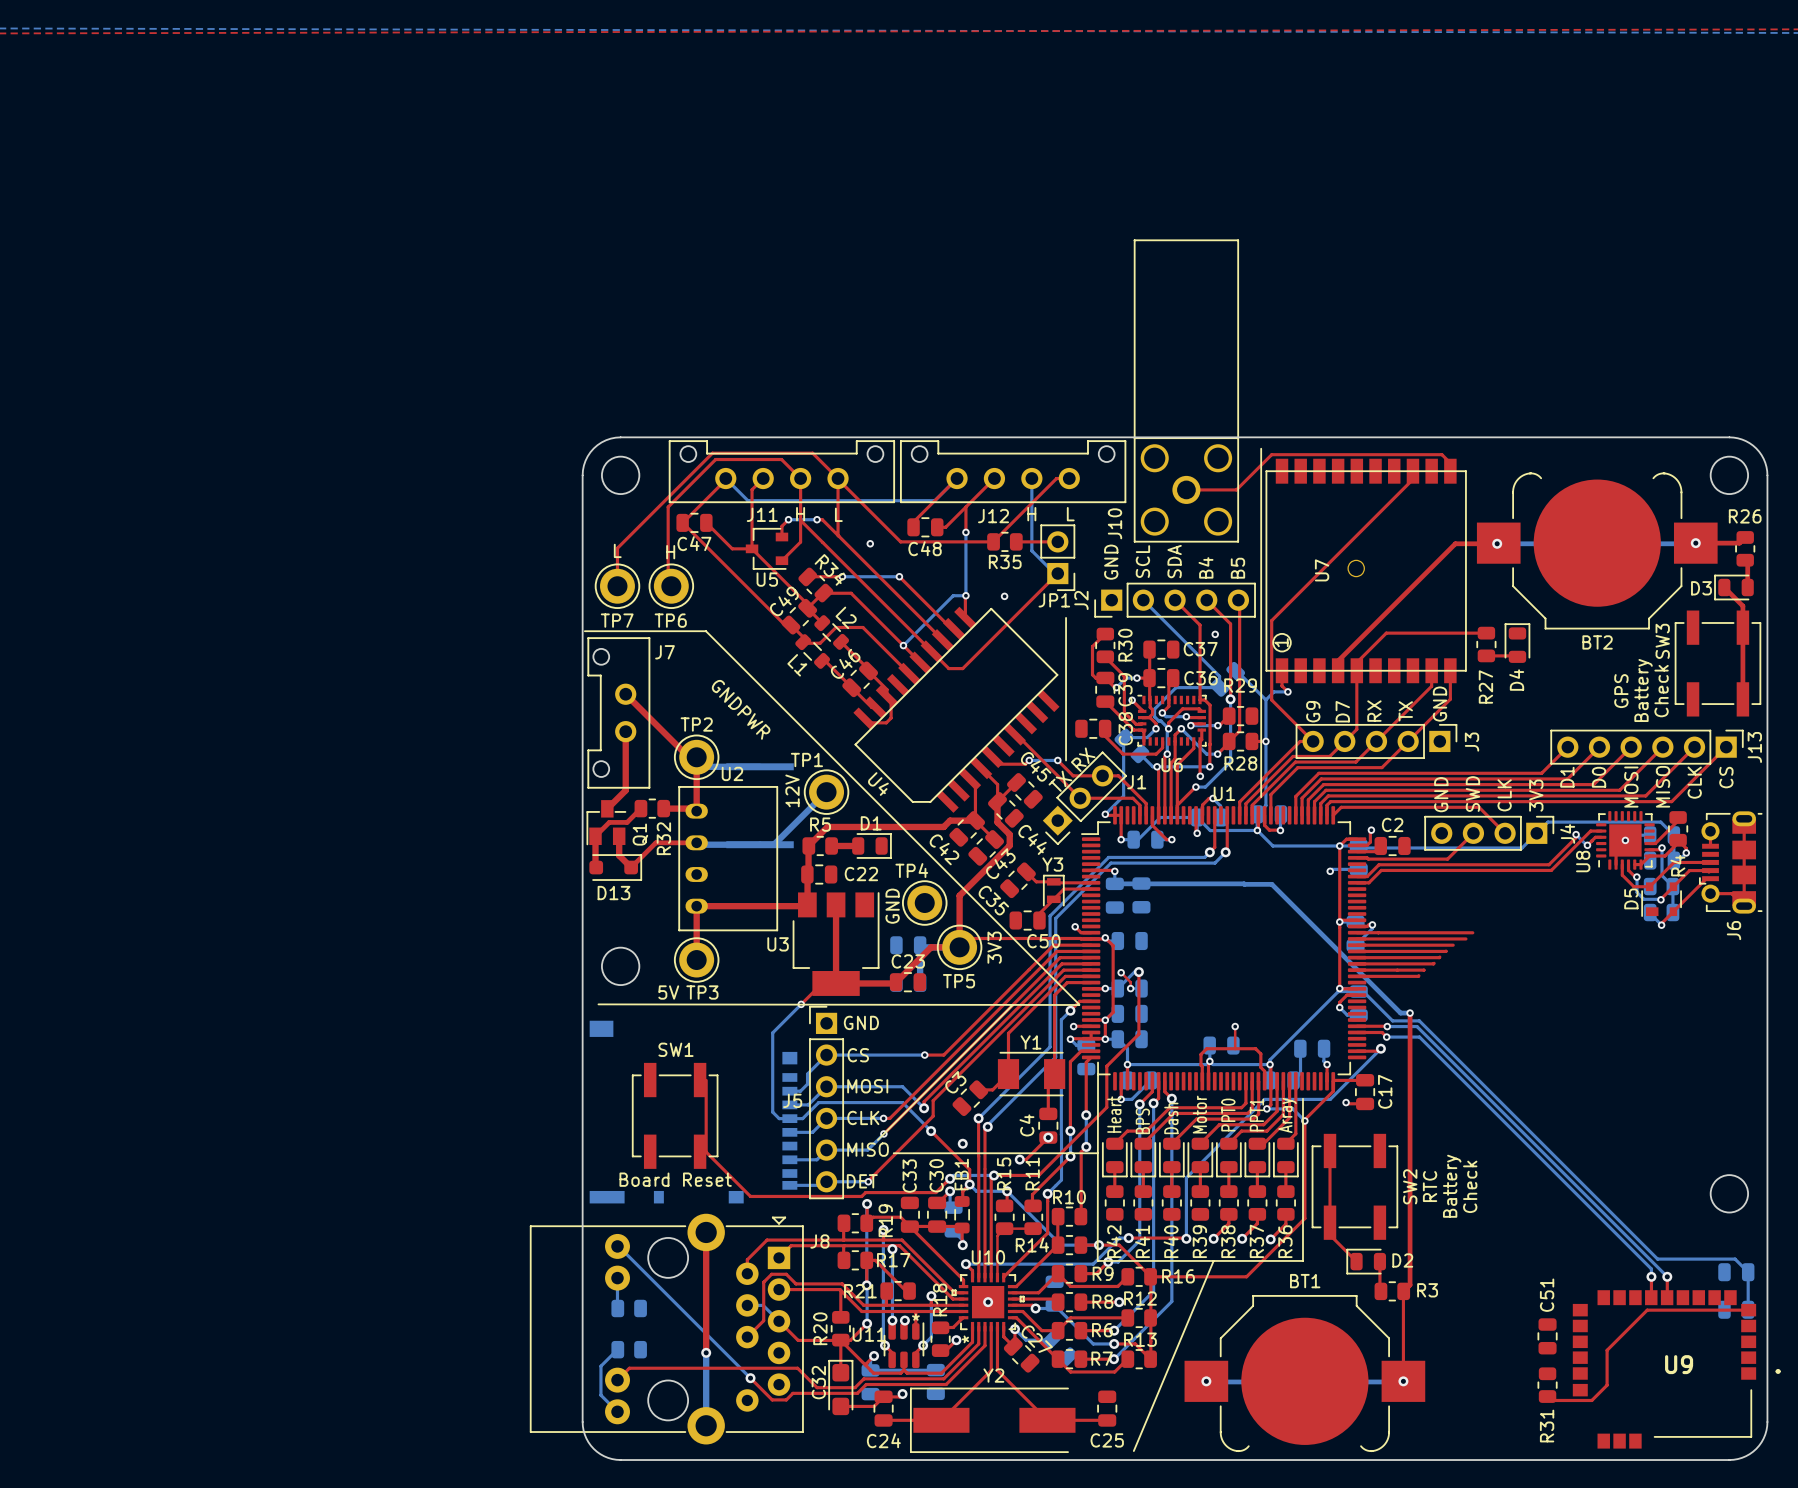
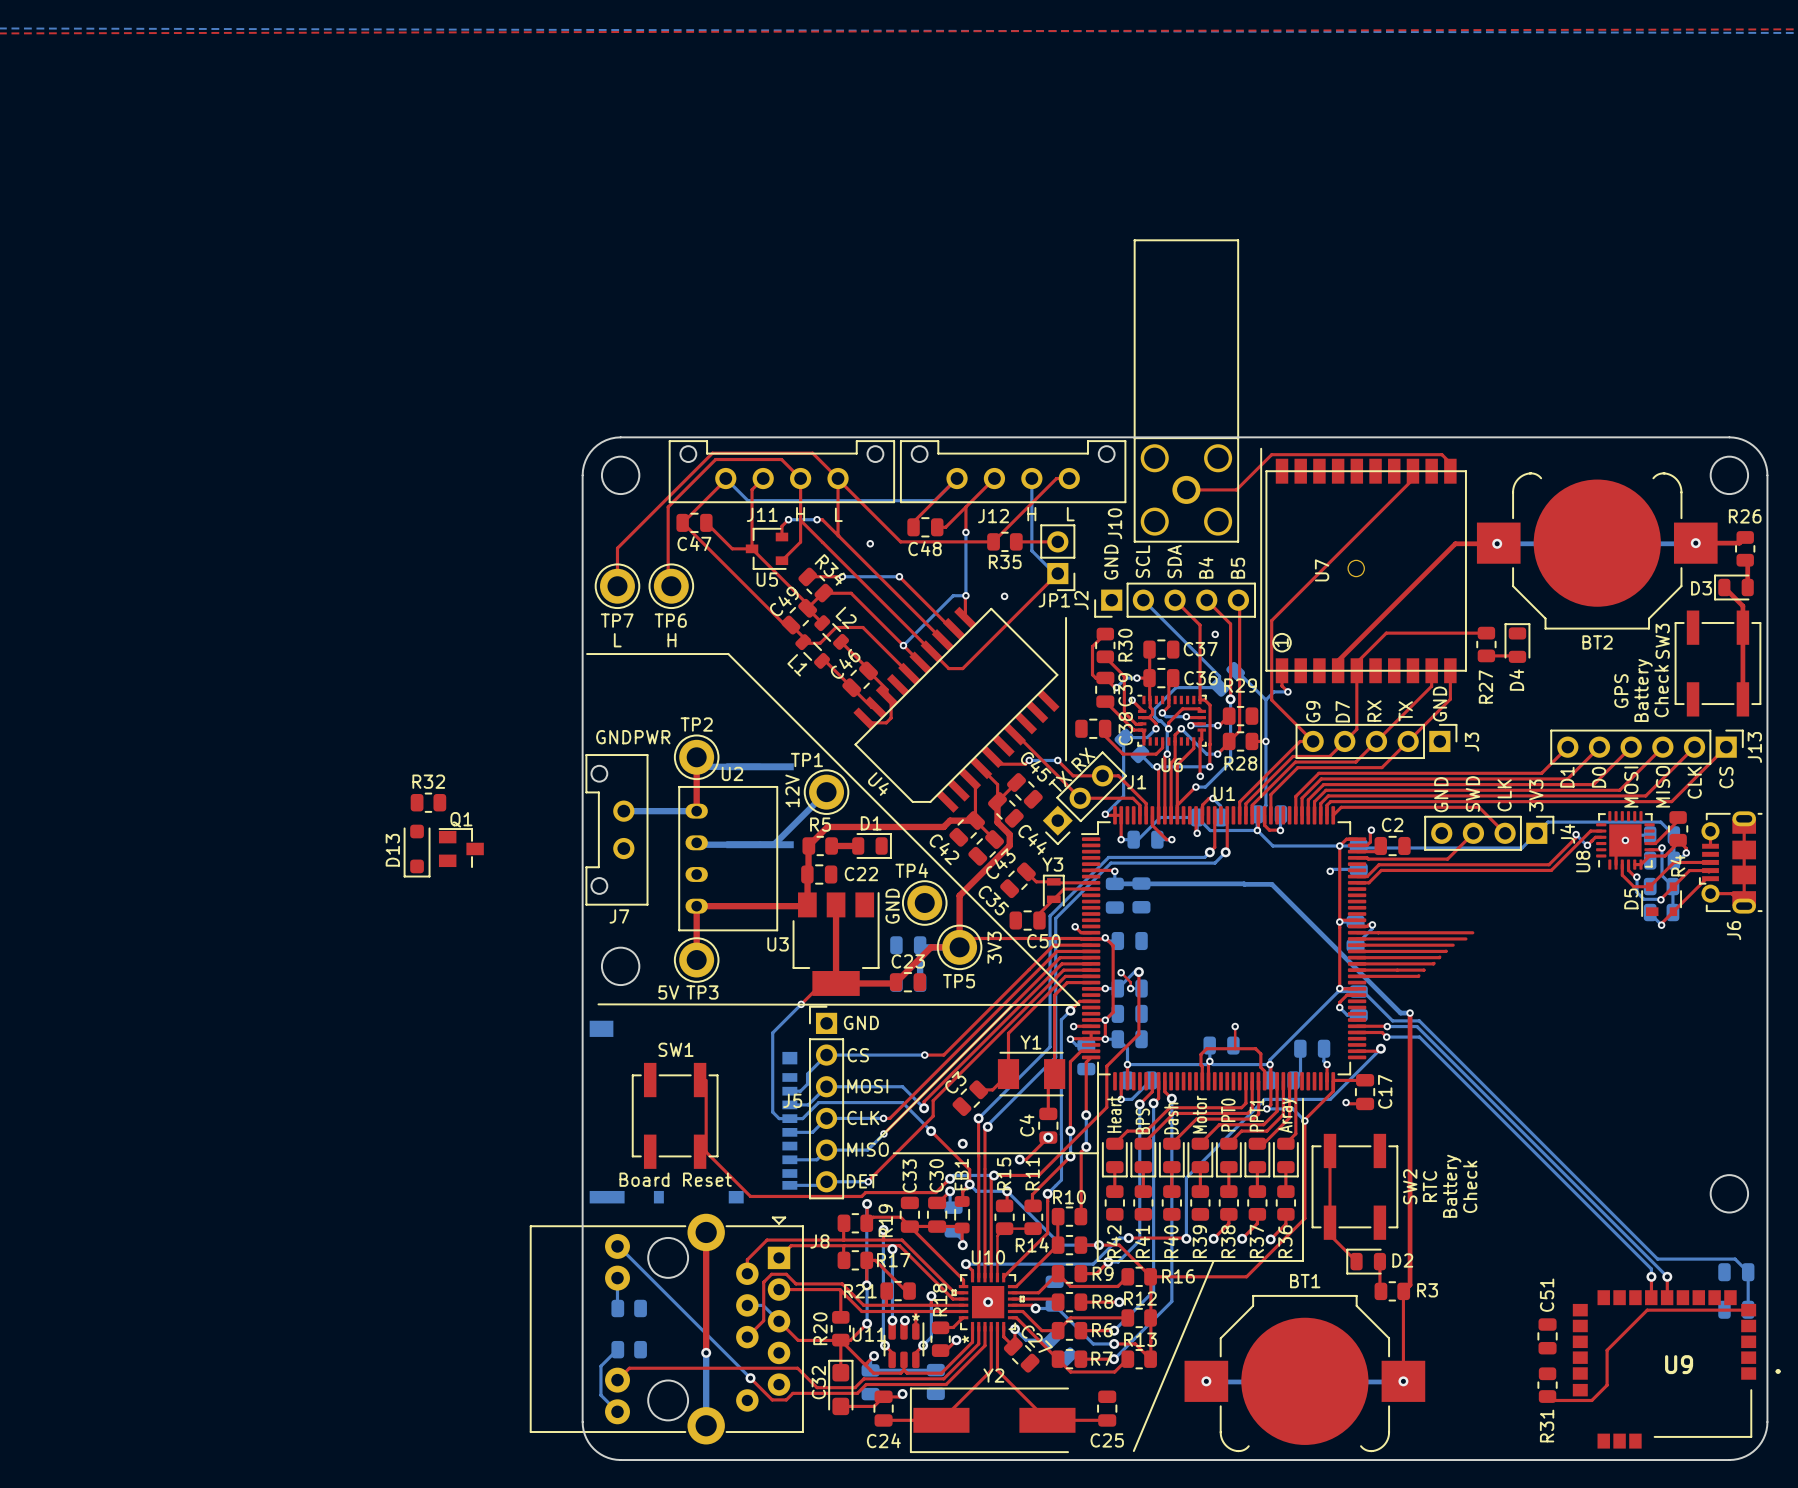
text position: L (617, 550) -> L (617, 640)
text position: H (670, 552) -> H (671, 640)
line: (584, 631) (706, 631) -> none
line: (706, 631) (1079, 1004) -> (728, 653) (1079, 1005)
J7 name position: J7 (665, 652) -> J7 (619, 916)
line: none -> (587, 654) (728, 654)
top track: (625, 694) (688, 757) (696, 757) -> none
text rotation: 0° (741, 709) -> 45° counterclockwise (633, 737)
text position: GNDPWR (741, 709) -> GNDPWR (633, 737)
J7 position: (618, 712) -> (616, 829)
top track: (625, 731) (625, 790) (607, 808) -> none
top track: (640, 808) (627, 822) (609, 822) (595, 836) (596, 867) -> none
R32 position: (652, 808) -> (428, 802)
top track: (663, 808) (694, 808) (696, 811) -> none
bottom track: none -> (623, 811) (696, 811)
Q1 rotation: 0° (606, 822) -> 90° clockwise (461, 848)
Q1 position: (606, 822) -> (461, 848)
Q1 name position: Q1 (640, 834) -> Q1 (461, 819)
top track: (619, 836) (619, 855) (631, 867) (655, 842) (696, 842) -> none
R32 name rotation: 0° (663, 838) -> 90° clockwise (428, 781)
R32 name position: R32 (663, 838) -> R32 (428, 781)
D13 rotation: 0° (615, 867) -> 90° clockwise (417, 850)
D13 position: (615, 867) -> (417, 850)

